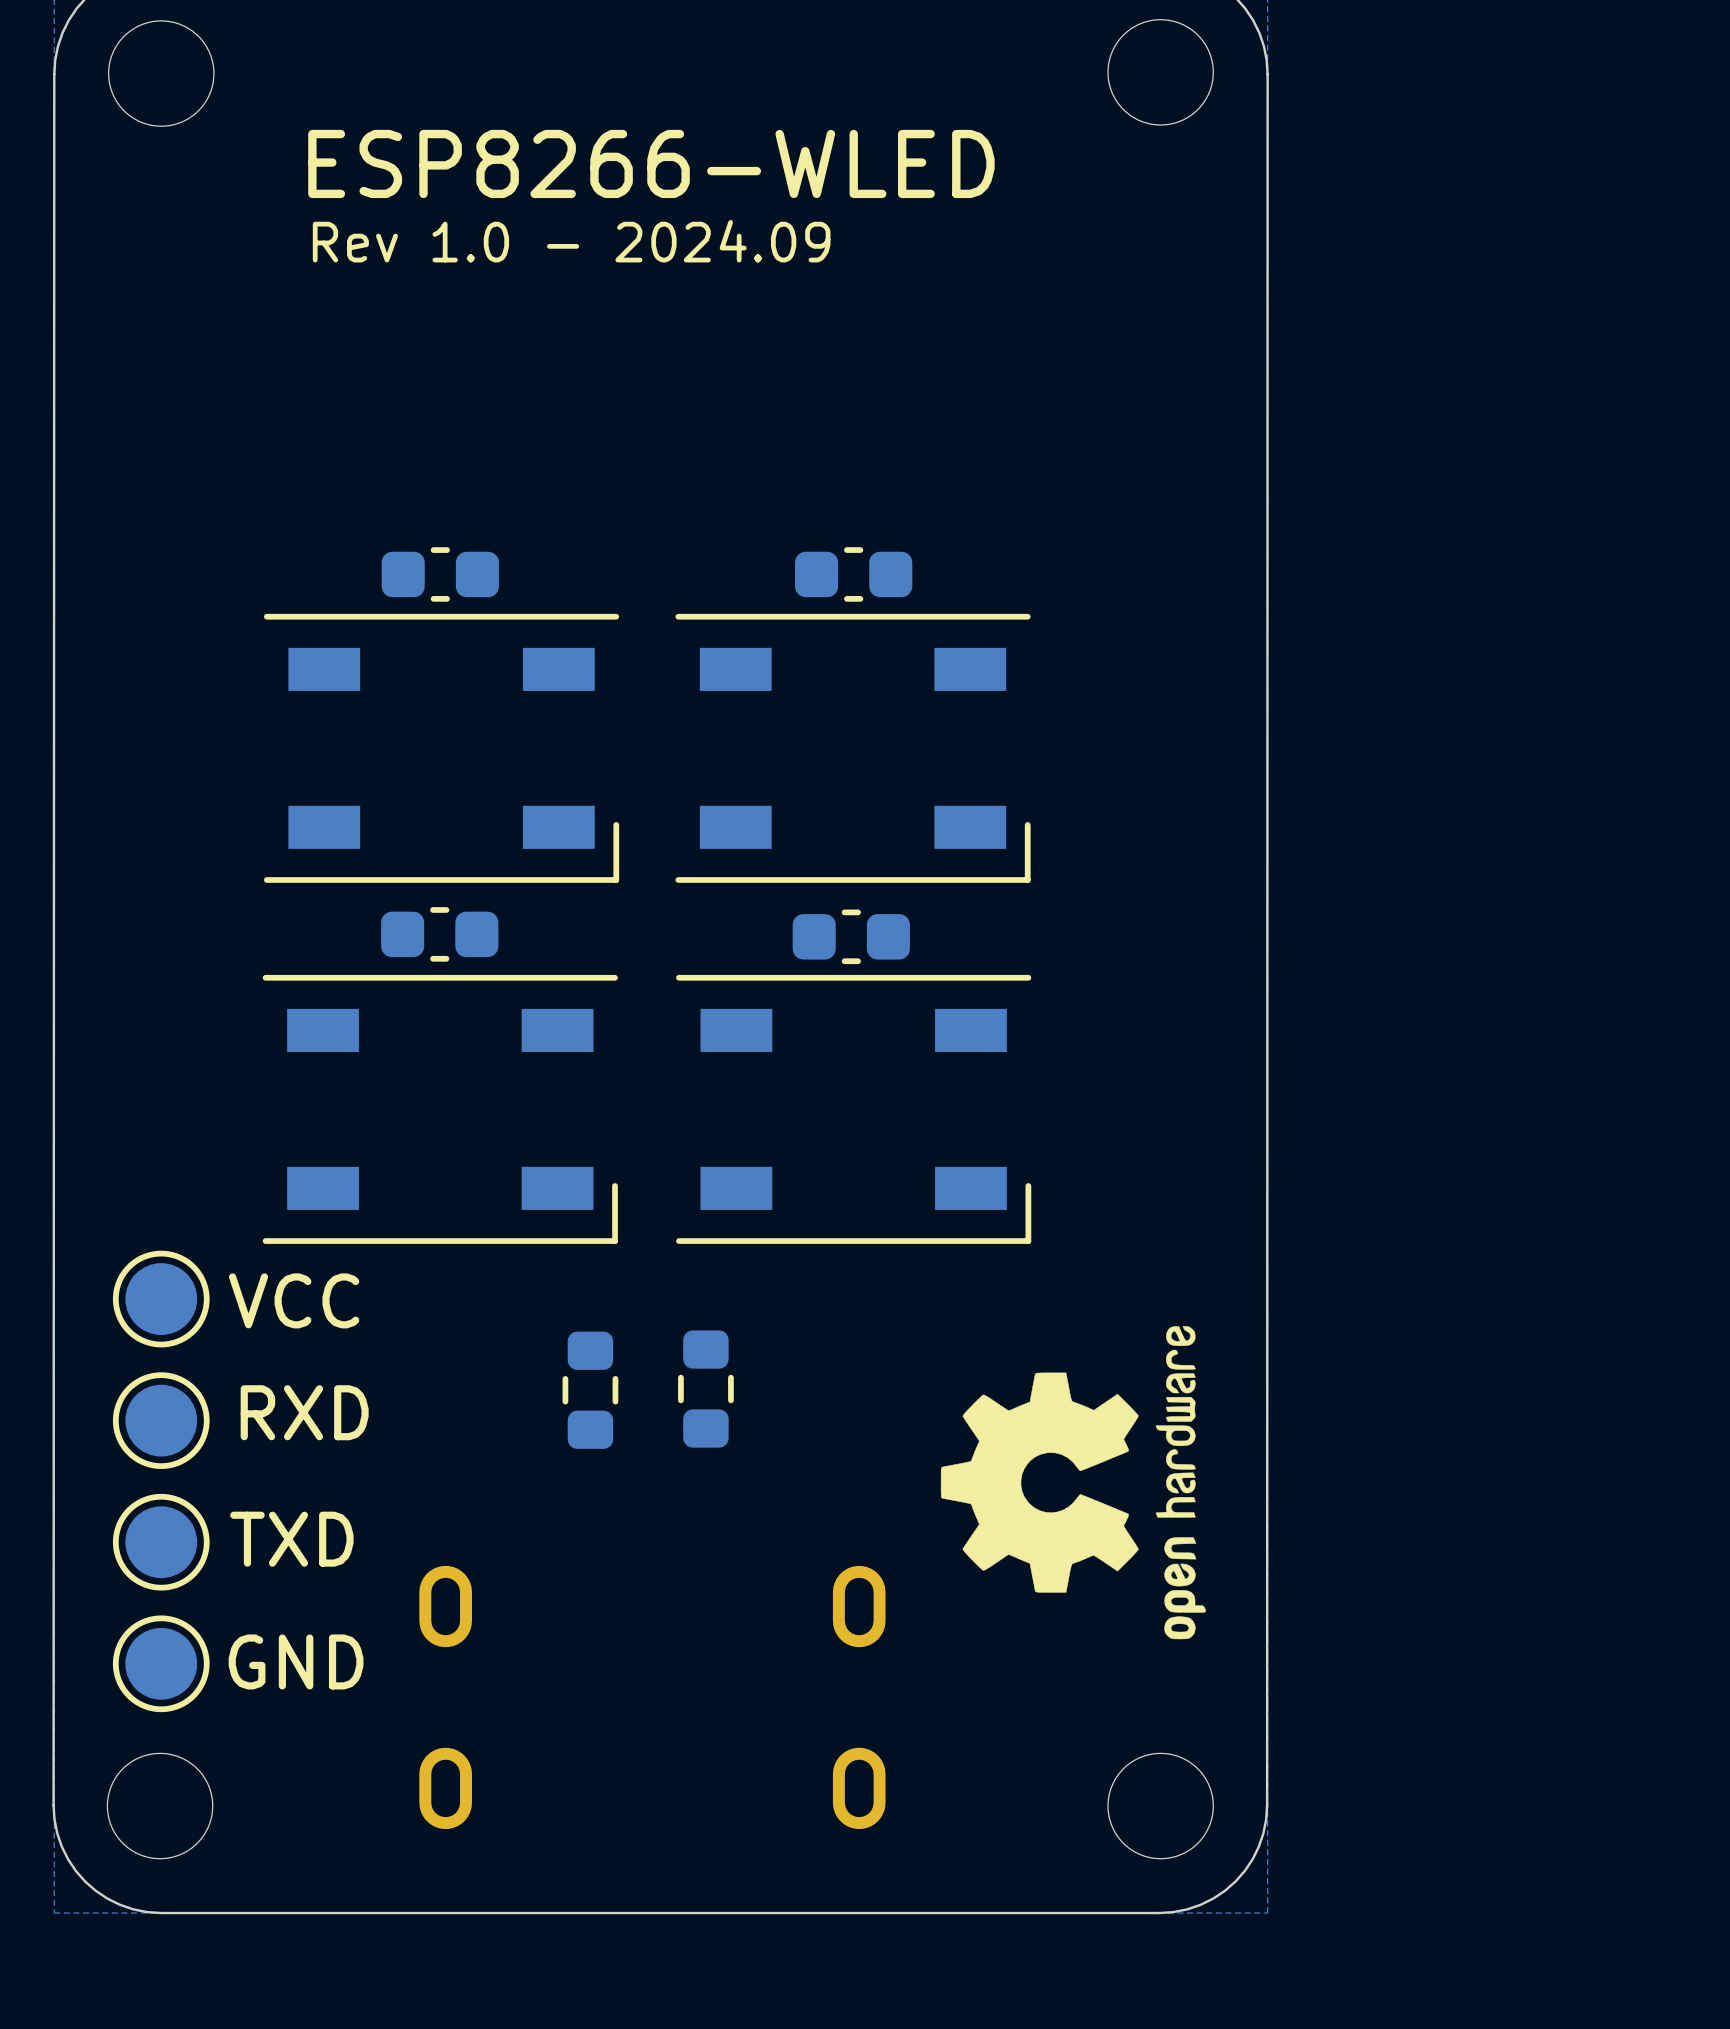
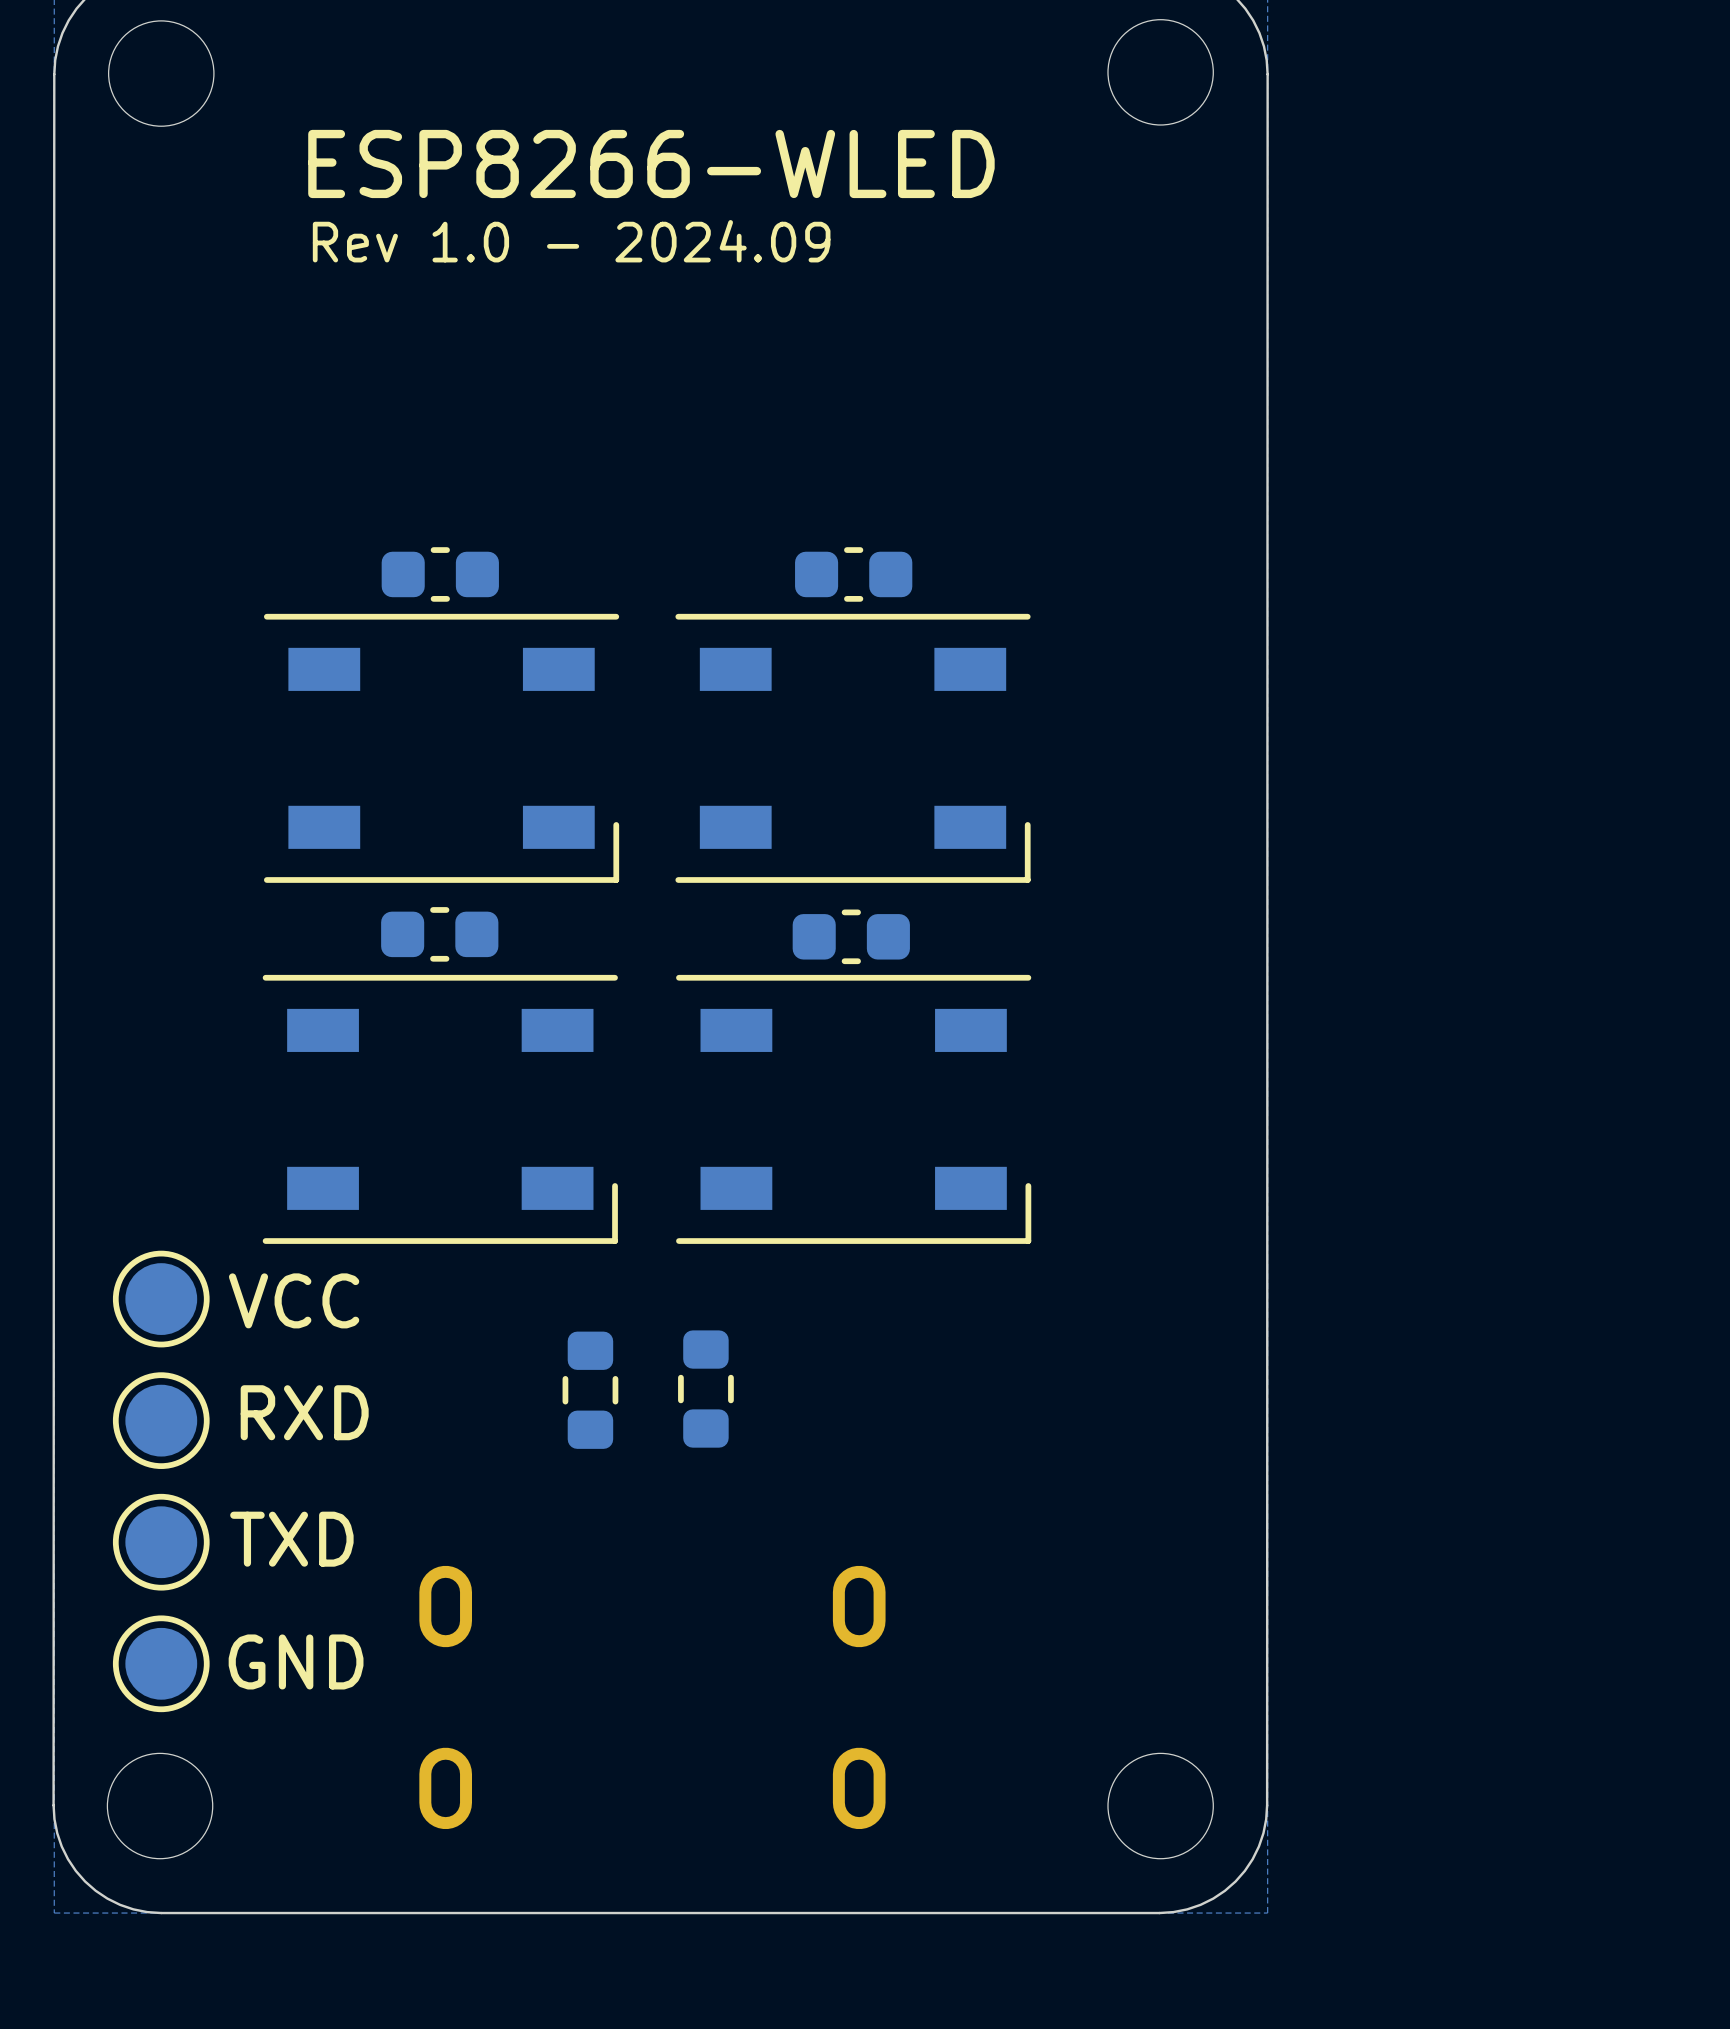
drawing: [940, 1326, 1206, 1640] -> none

